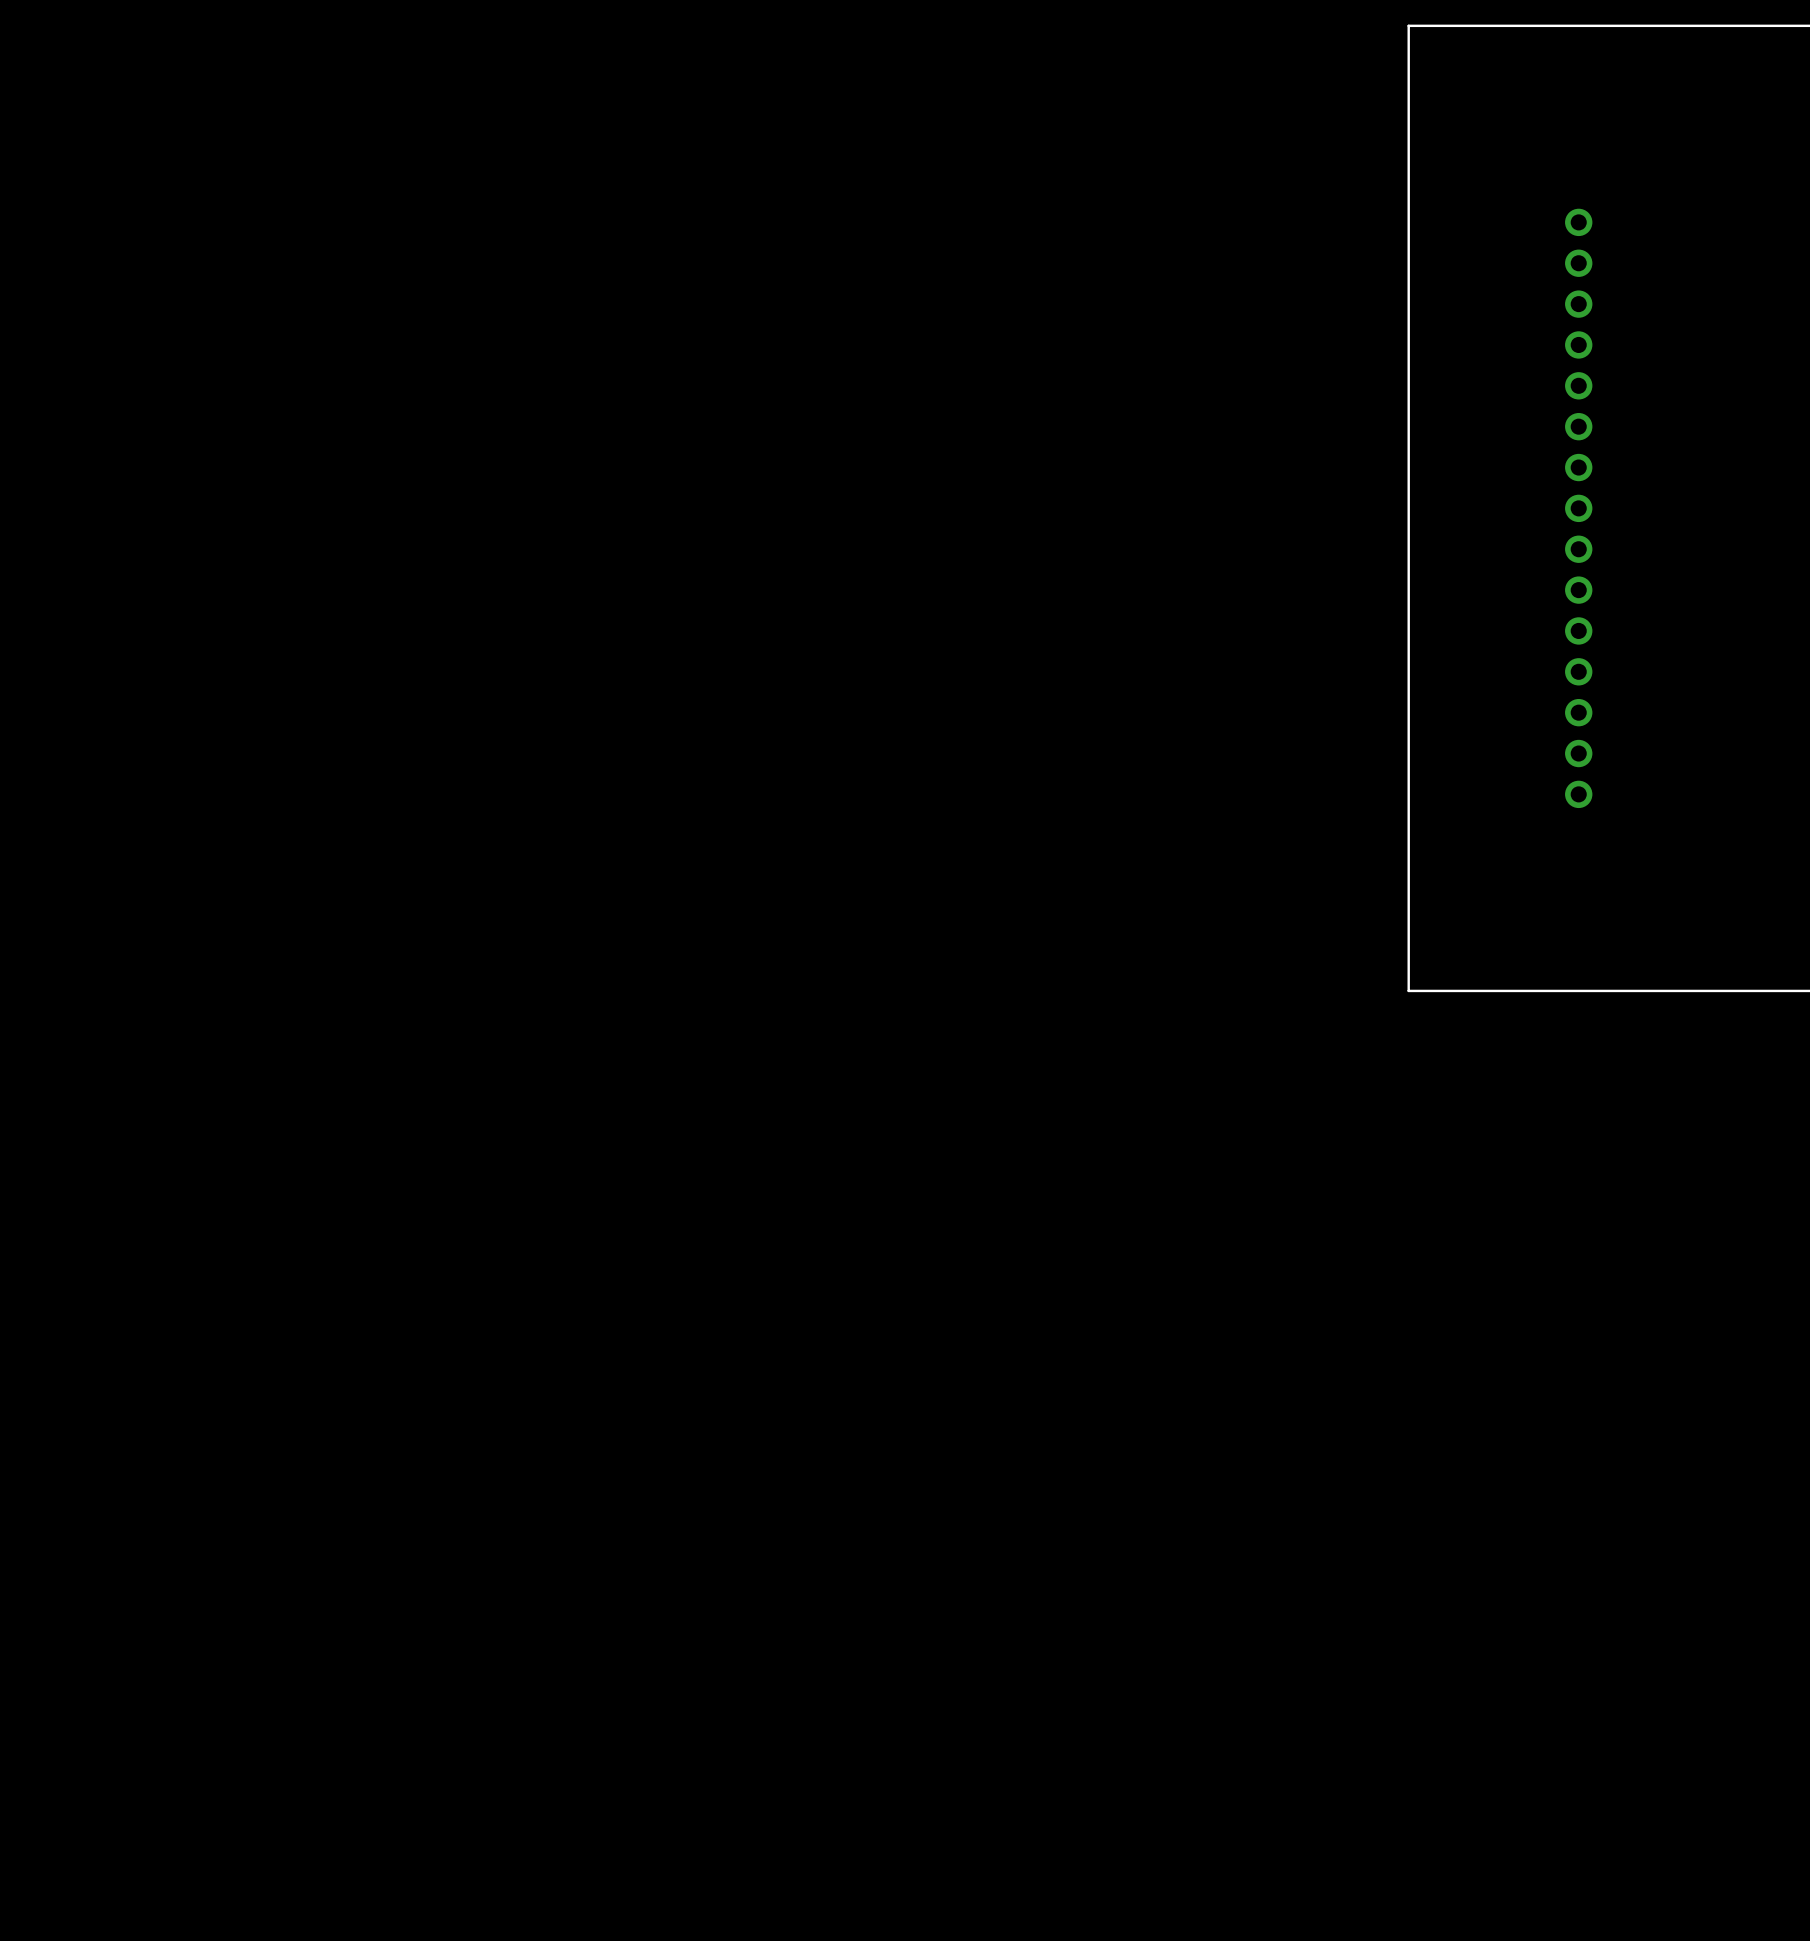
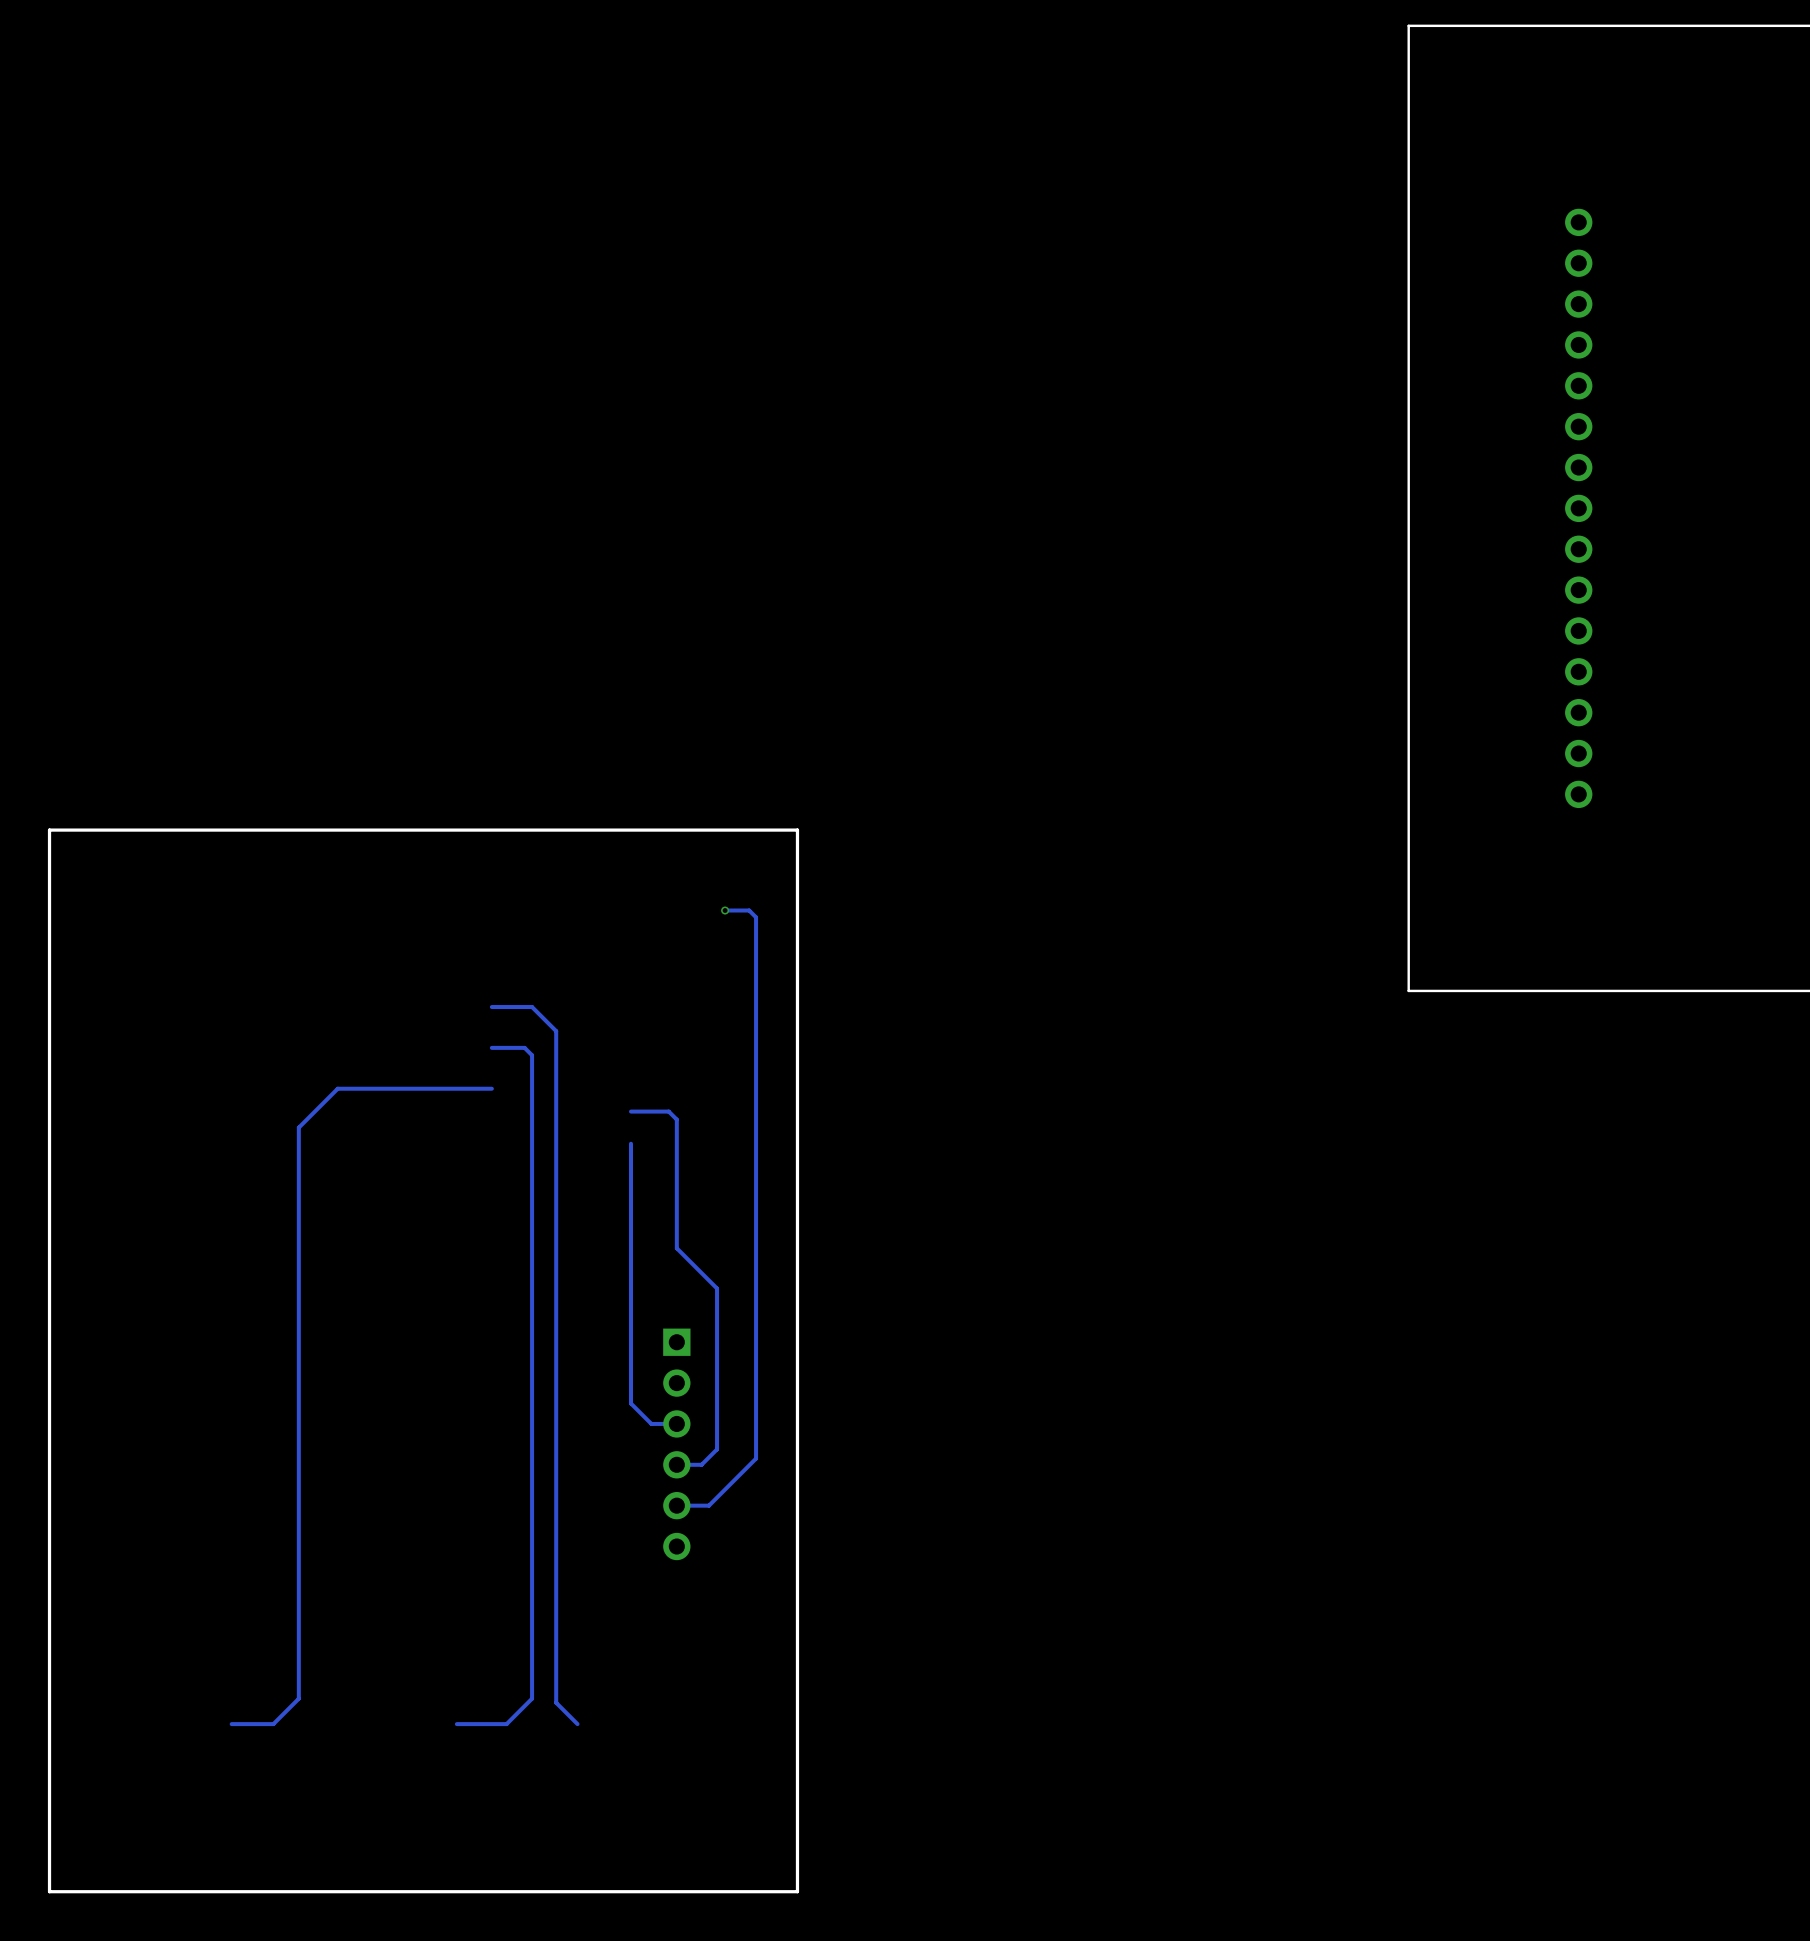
board edge: none -> (797, 830) (49, 830) (49, 1891) (797, 1891) (797, 830)
track: none -> (725, 910) (749, 910) (756, 917) (756, 1458) (709, 1505) (676, 1505)
via: none -> (725, 910)
track: none -> (491, 1007) (532, 1007) (556, 1031) (556, 1702) (577, 1724)
track: none -> (491, 1047) (524, 1047) (532, 1055) (532, 1698) (506, 1724) (456, 1724)
track: none -> (491, 1088) (337, 1088) (298, 1127) (298, 1698) (273, 1724) (231, 1724)
track: none -> (630, 1111) (668, 1111) (676, 1119) (676, 1248) (717, 1288) (717, 1449) (701, 1464) (676, 1464)
track: none -> (630, 1143) (630, 1403) (651, 1423) (676, 1423)
part: none -> (676, 1444)

